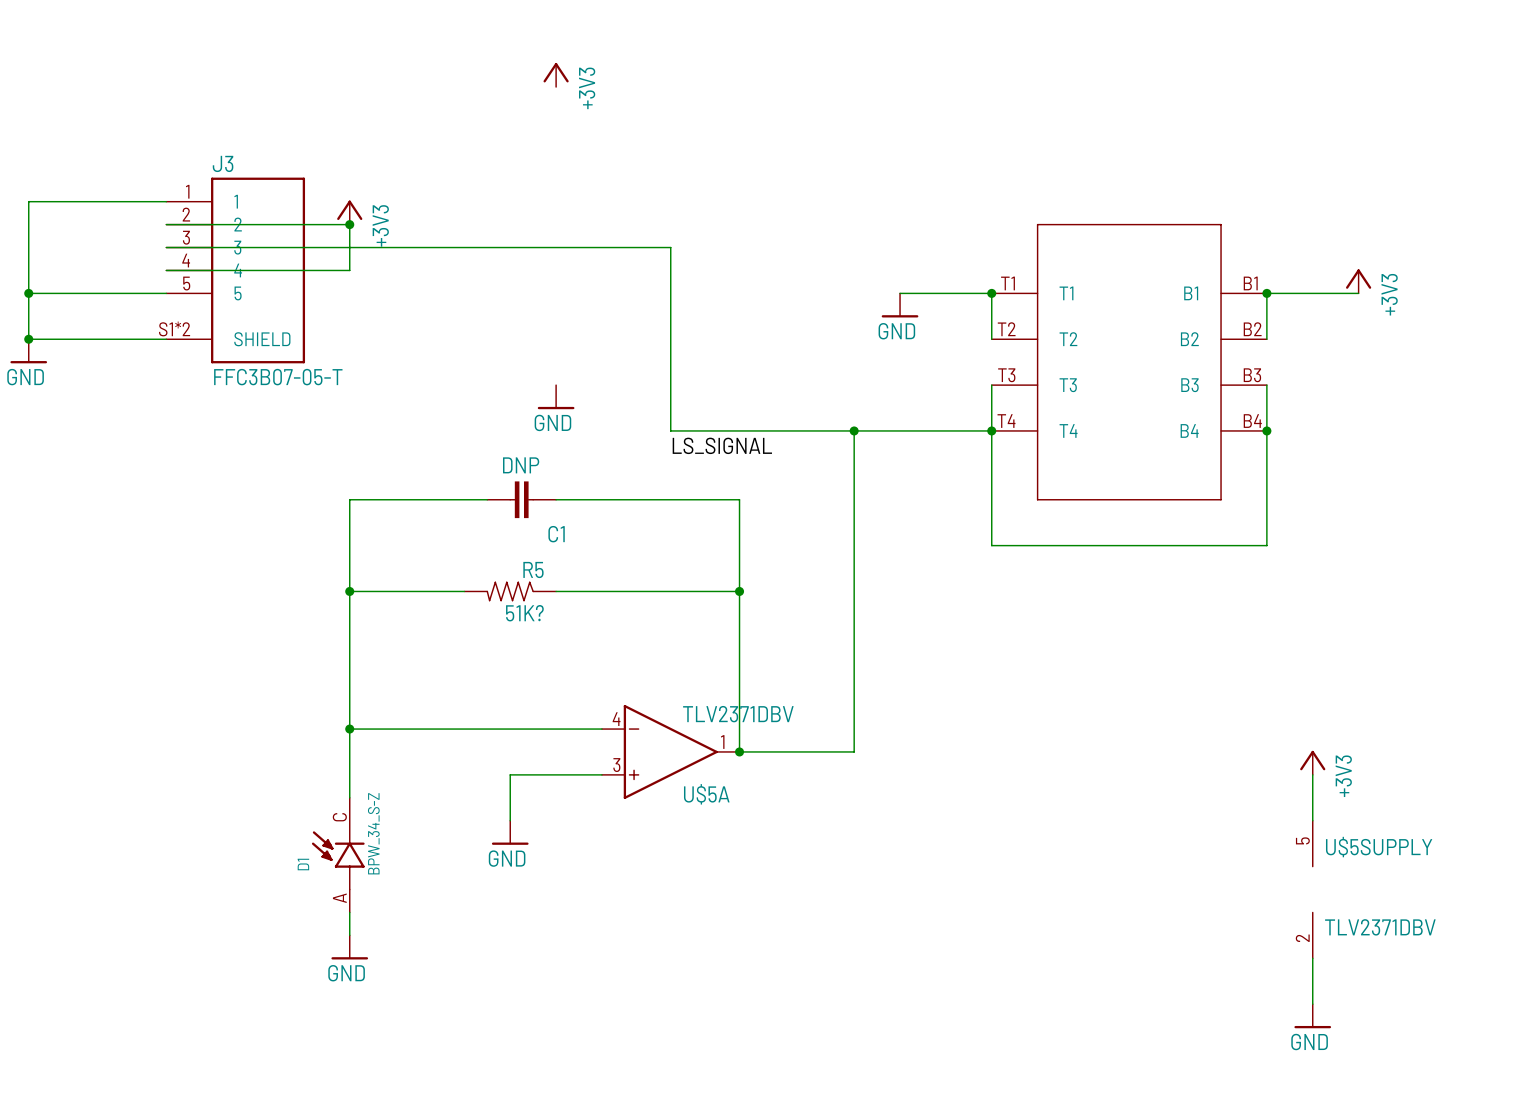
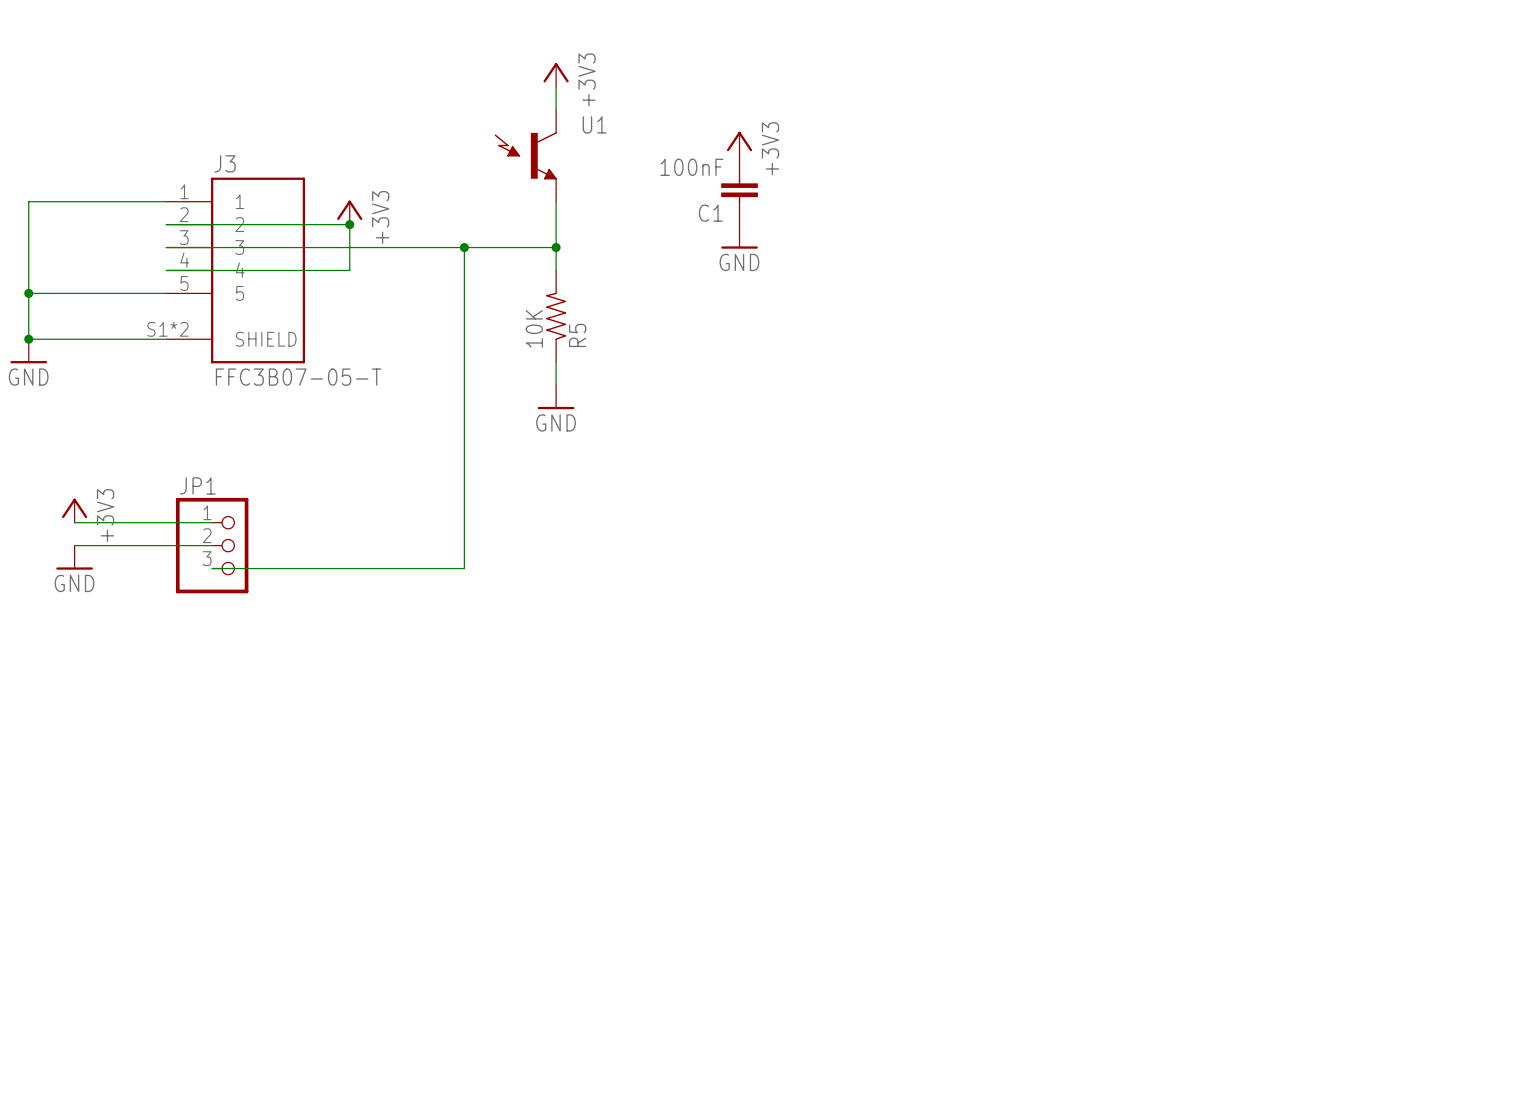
wire: none -> (556, 87) (556, 109)
power symbol: none -> +3V3 (739, 143)
U1: none -> (525, 155)
wire: none -> (556, 201) (556, 270)
wire: none -> (464, 247) (464, 568) (212, 568)
junction: none -> (464, 247)
wire: (556, 247) (670, 247) (670, 430) (991, 430) -> none
junction: none -> (556, 247)
power symbol: +3V3 (1358, 281) -> none
wire: (900, 293) (991, 293) (991, 339) -> none
junction: (991, 293) -> none
junction: (1266, 293) -> none
wire: (1358, 293) (1266, 293) (1266, 339) -> none
power symbol position: GND (900, 305) -> GND (739, 236)
wire: none -> (556, 362) (556, 385)
part: (1129, 362) -> none
wire: (991, 385) (991, 545) (1266, 545) (1266, 385) -> none
wire: (854, 430) (854, 751) (739, 751) (739, 499) (556, 499) -> none
junction: (854, 430) -> none
junction: (991, 430) -> none
junction: (1266, 430) -> none
label: LS_SIGNAL (722, 445) -> none
C1 value: DNP (521, 465) -> 100nF (691, 167)
wire: (487, 499) (349, 499) (349, 797) -> none
C1 rotation: 0° (521, 499) -> 90° clockwise (739, 190)
C1 position: (521, 499) -> (739, 190)
power symbol: none -> +3V3 (74, 510)
wire: none -> (74, 522) (212, 522)
C1 name position: C1 (556, 534) -> C1 (710, 213)
wire: none -> (74, 545) (212, 545)
JP1: none -> (212, 545)
power symbol: none -> GND (74, 557)
wire: (349, 591) (464, 591) -> none
junction: (349, 591) -> none
R5 rotation: 0° (510, 591) -> 90° clockwise (556, 316)
R5 position: (510, 591) -> (556, 316)
wire: (556, 591) (739, 591) -> none
junction: (739, 591) -> none
R5 value: 51K? (524, 613) -> 10K (534, 328)
wire: (349, 729) (601, 729) -> none
junction: (349, 729) -> none
U$5A: TLV2371DBV (670, 751) -> none
junction: (739, 751) -> none
power symbol: +3V3 (1312, 762) -> none
wire: (601, 774) (510, 774) (510, 820) -> none
wire: (1312, 774) (1312, 820) -> none
power symbol: GND (510, 832) -> none
D1: BPW_34_S-Z (338, 855) -> none
U$5SUPPLY: TLV2371DBV (1312, 889) -> none
wire: (349, 912) (349, 935) -> none
power symbol: GND (349, 947) -> none
wire: (1312, 958) (1312, 1004) -> none
power symbol: GND (1312, 1016) -> none

